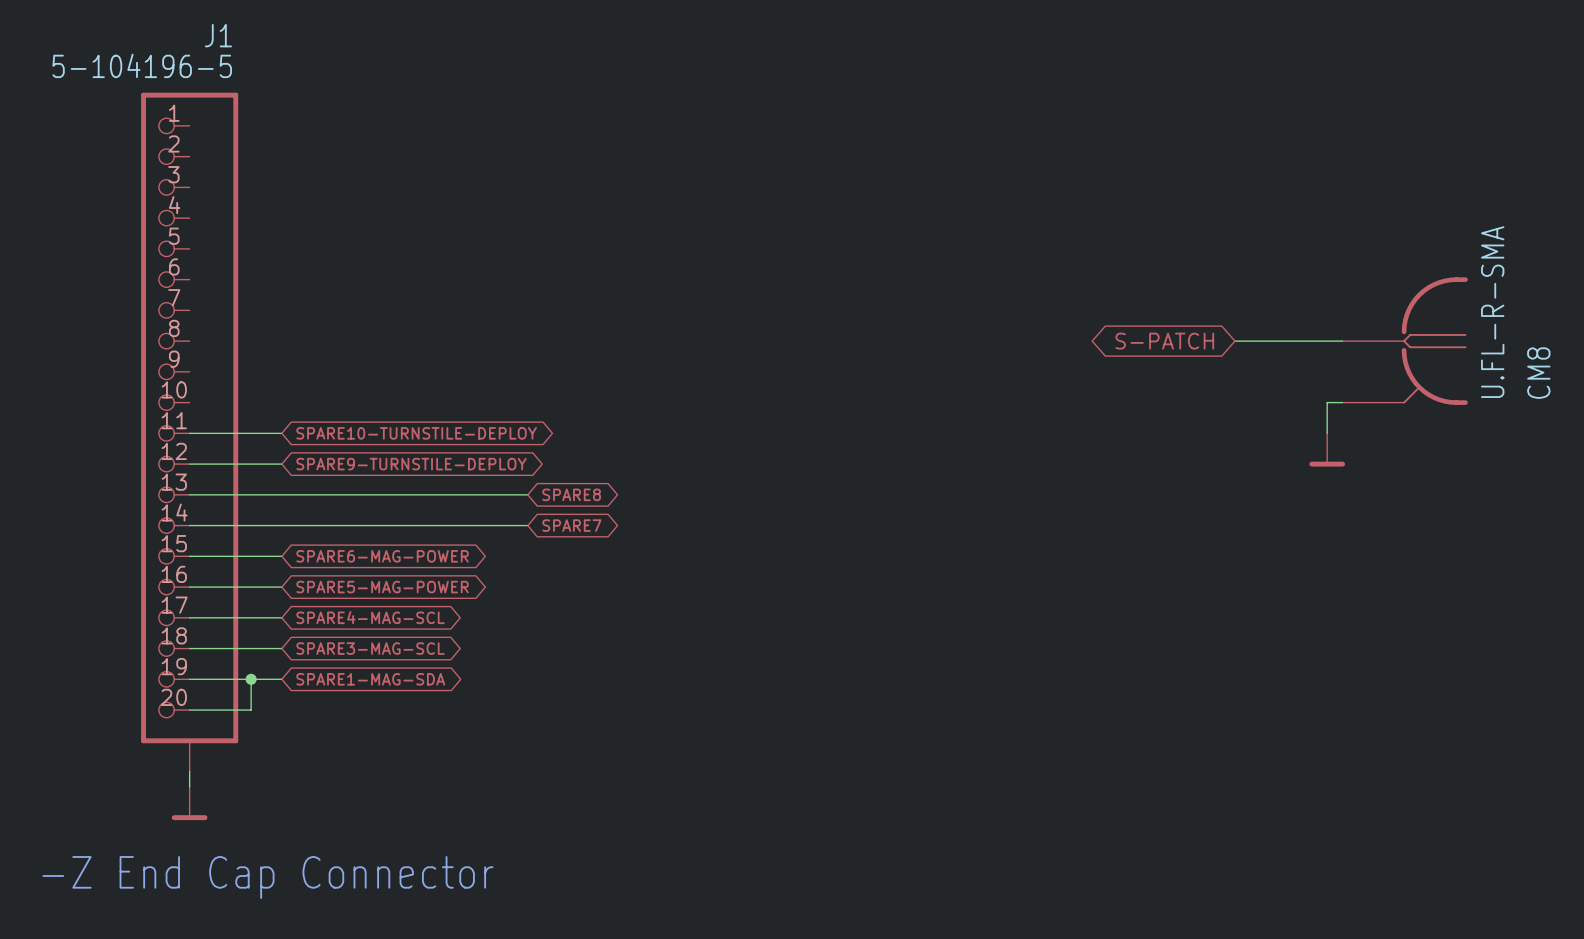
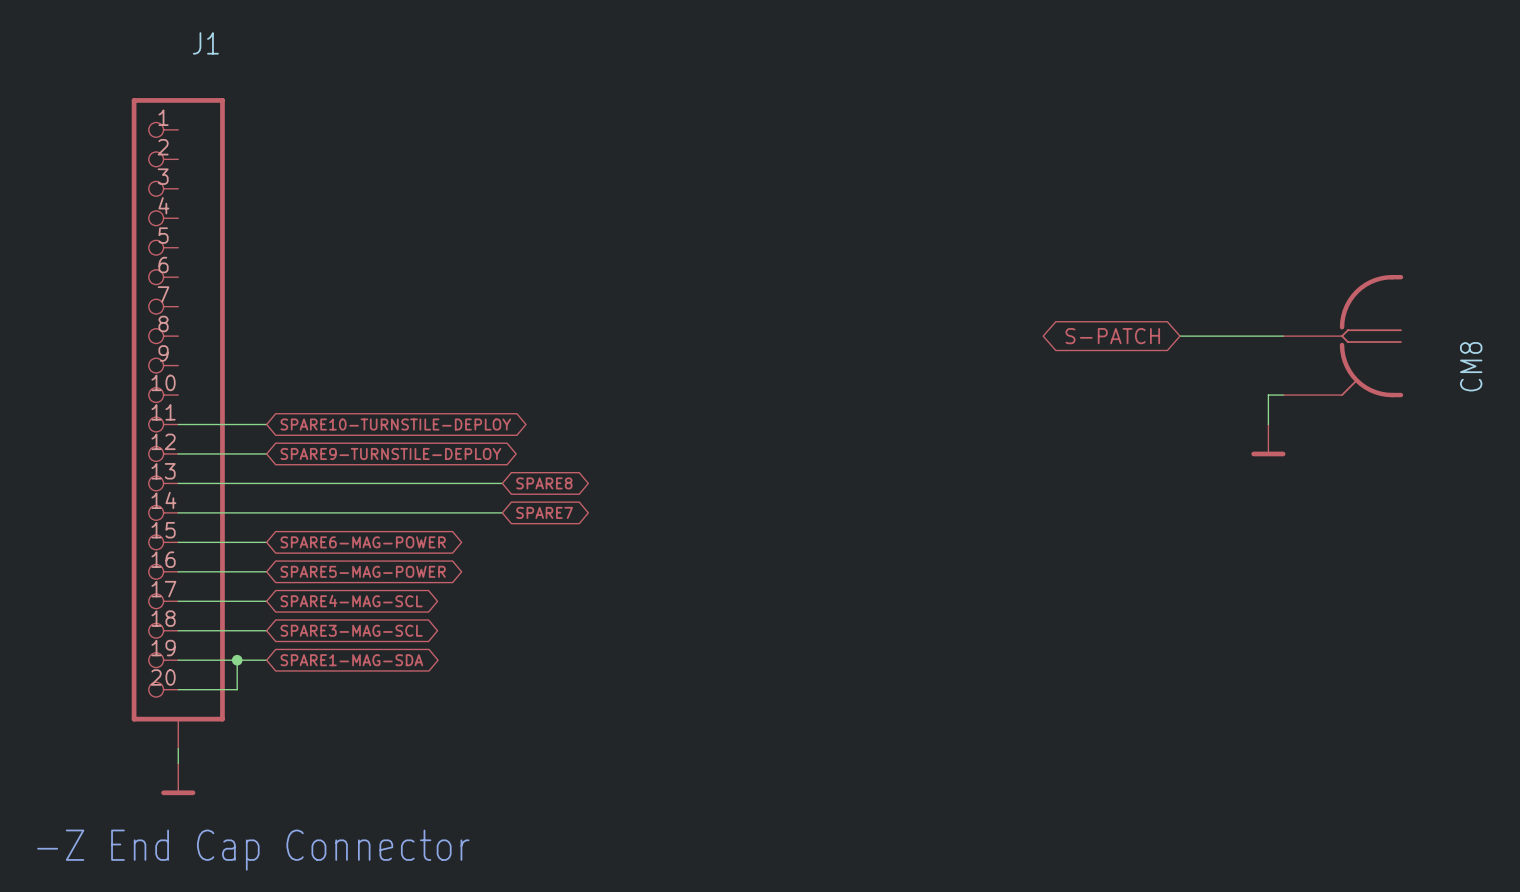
J1 value: 5-104196-5 (142, 65) -> none
CM8 value: U.FL-R-SMA (1492, 312) -> none

